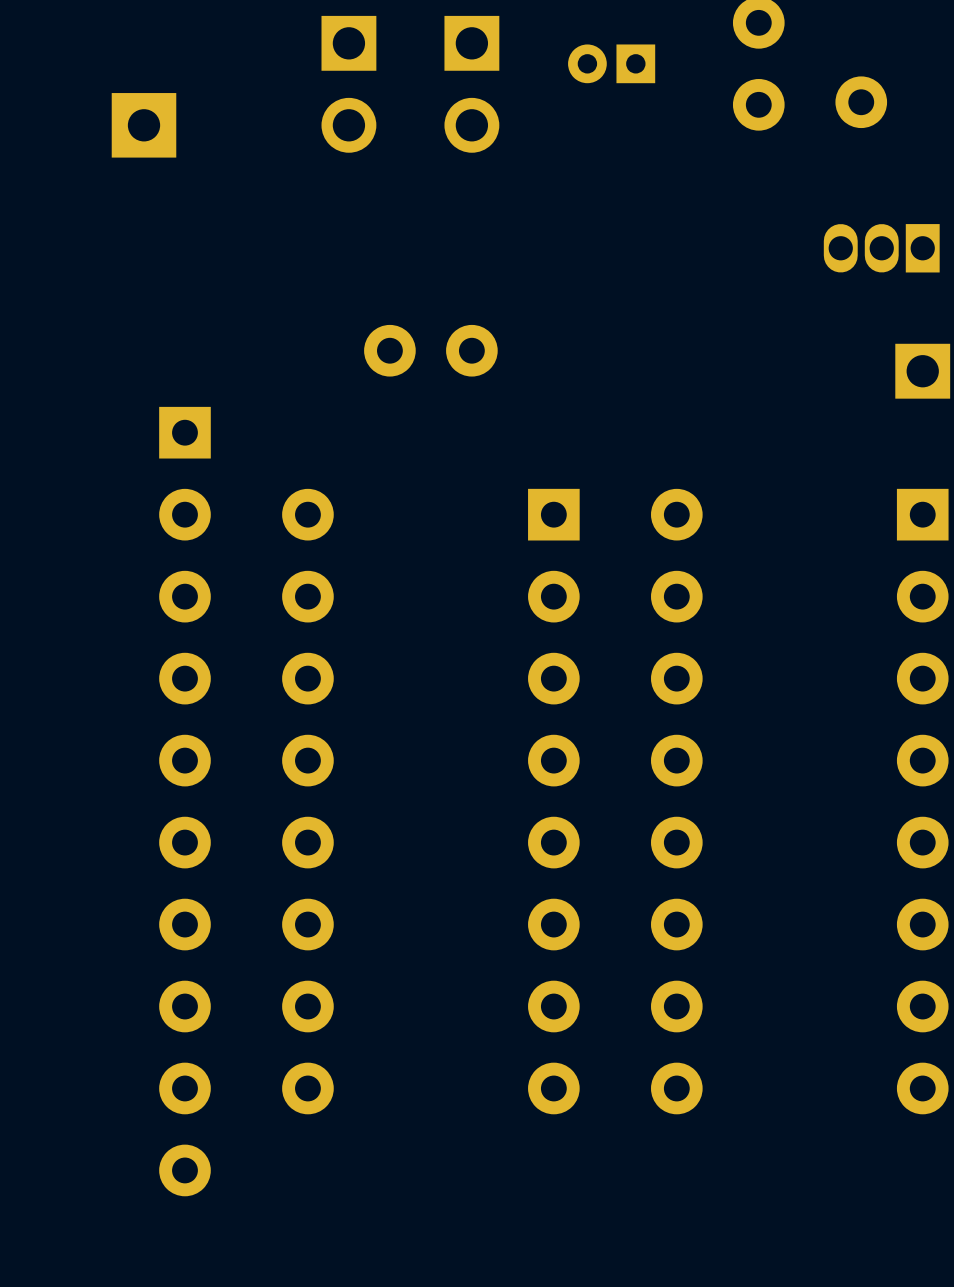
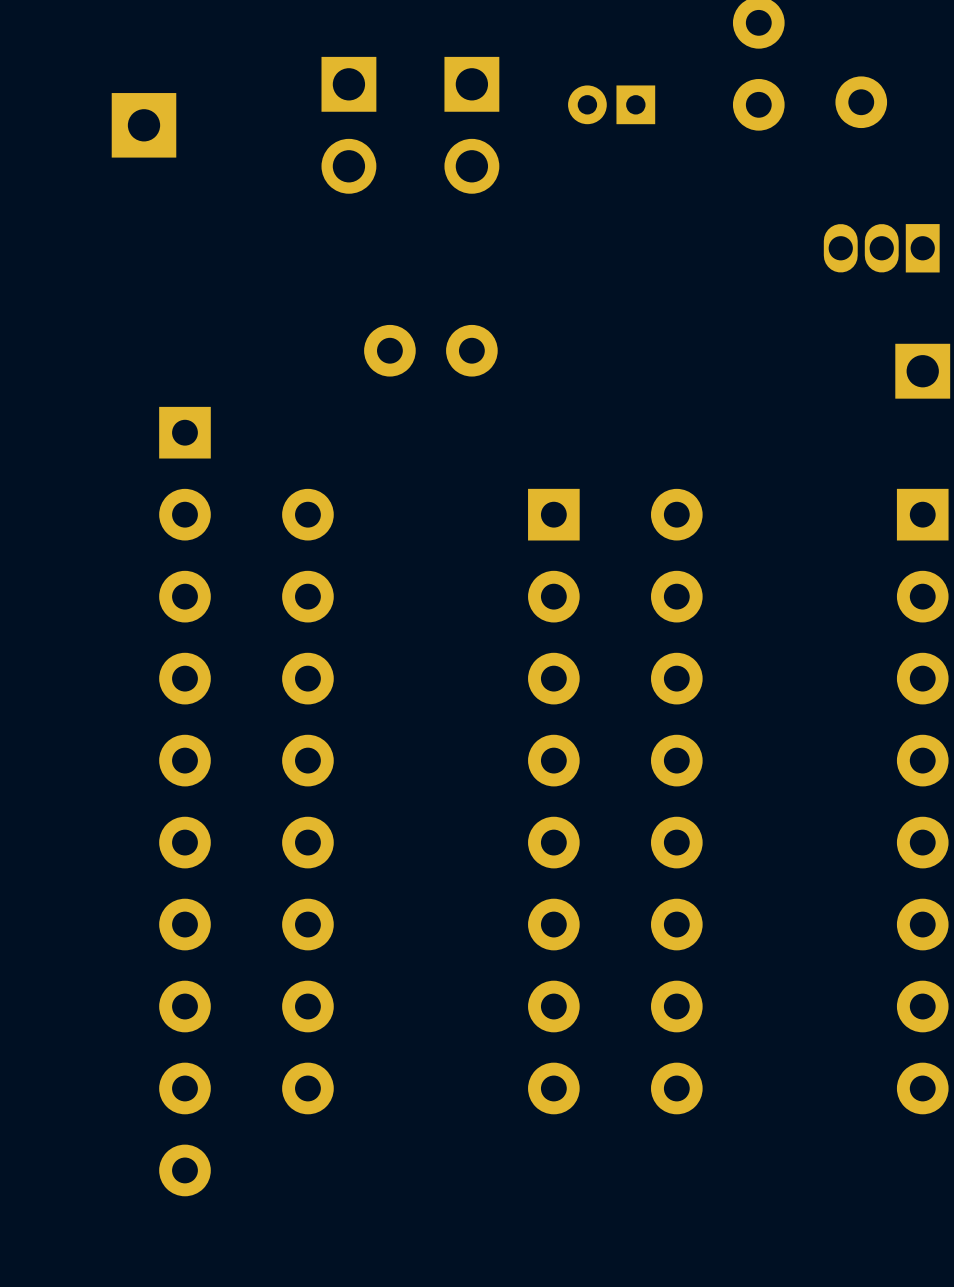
part position: (611, 63) -> (611, 104)
part position: (348, 84) -> (348, 125)
part position: (471, 84) -> (471, 125)

